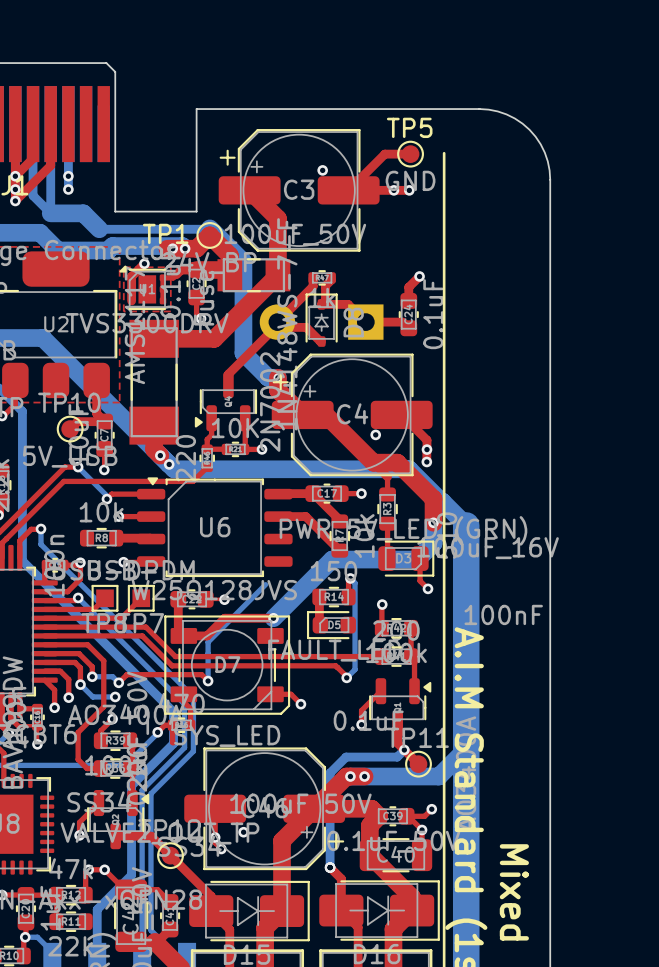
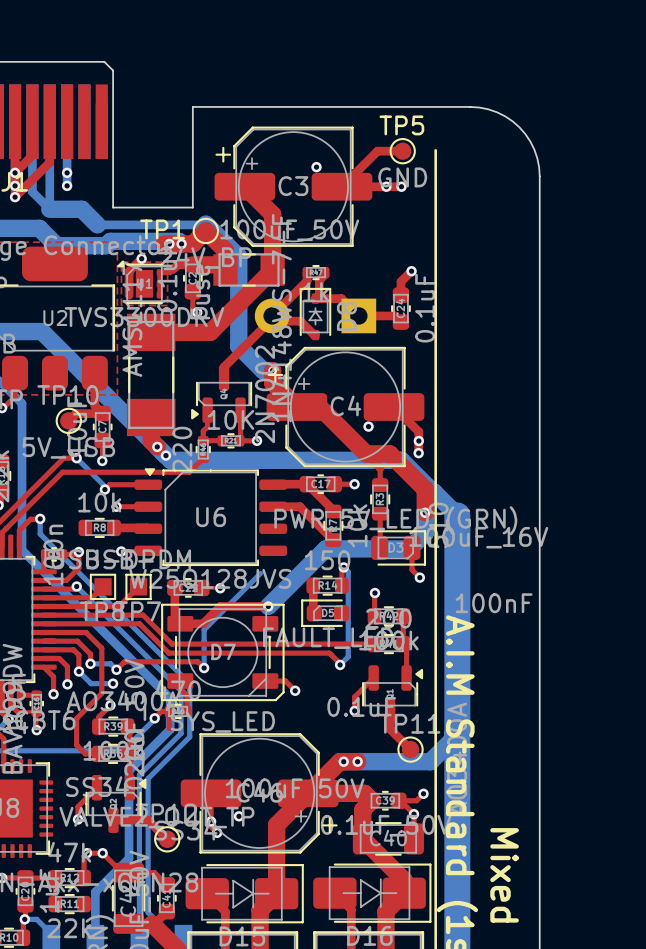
bottom track: (404, 749) (397, 757) (346, 757) (330, 773) (330, 867) -> none
via: (404, 749) -> none
top track: (170, 855) (211, 896) (211, 911) -> none
top track: (330, 867) (341, 878) (341, 910) -> none
via: (330, 867) -> none

